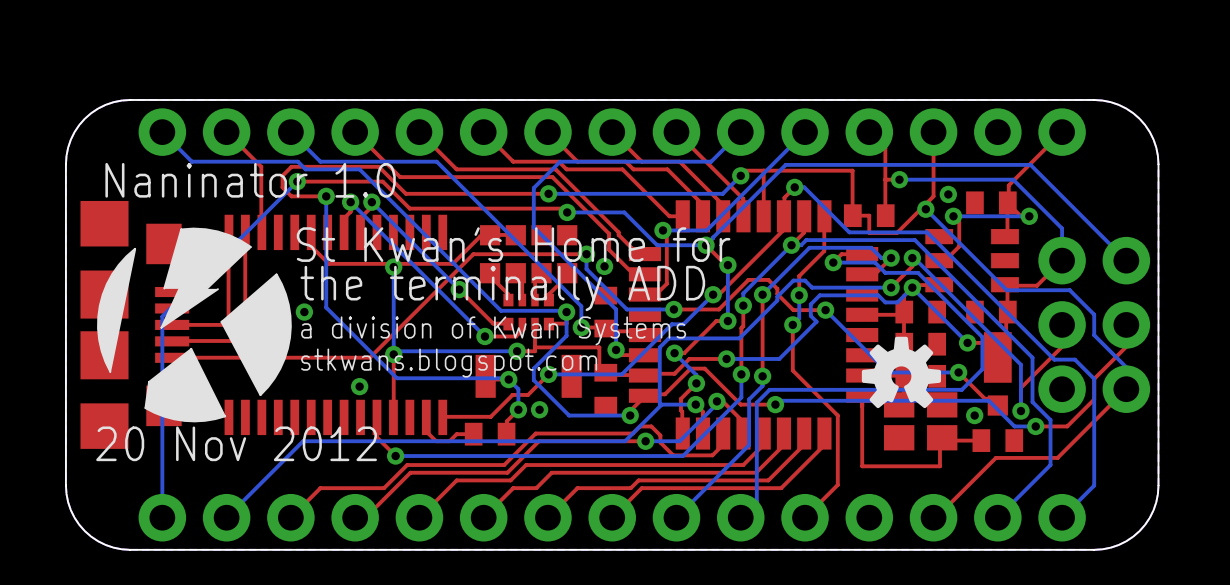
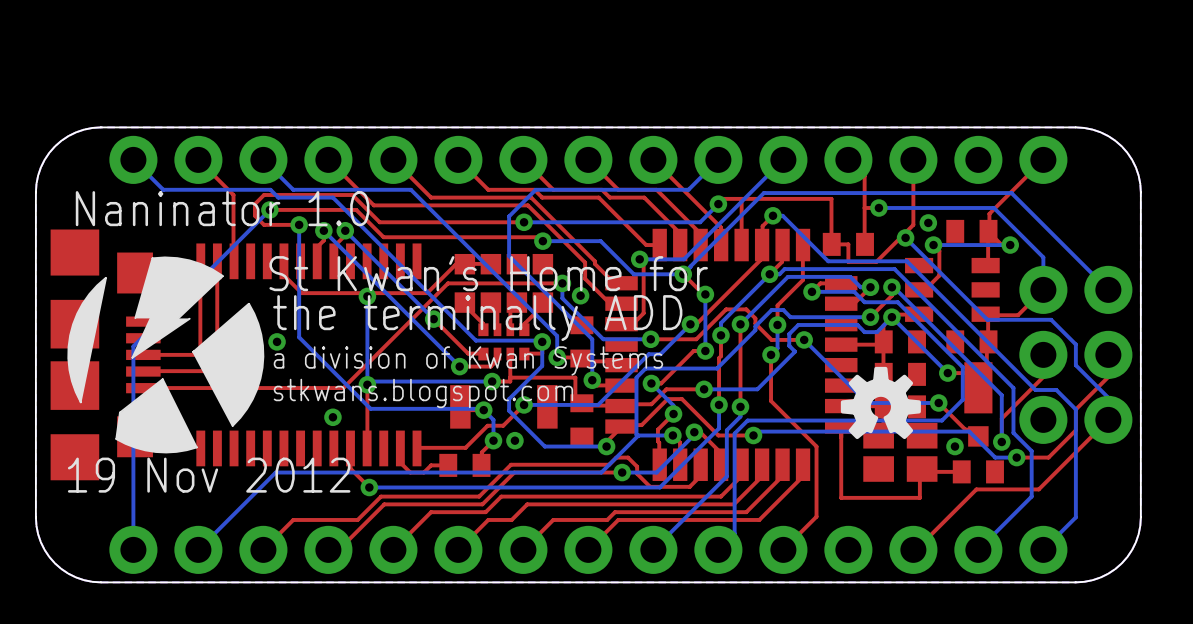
text: 20 Nov 2012 (236, 443) -> 19 Nov 2012 (209, 475)

